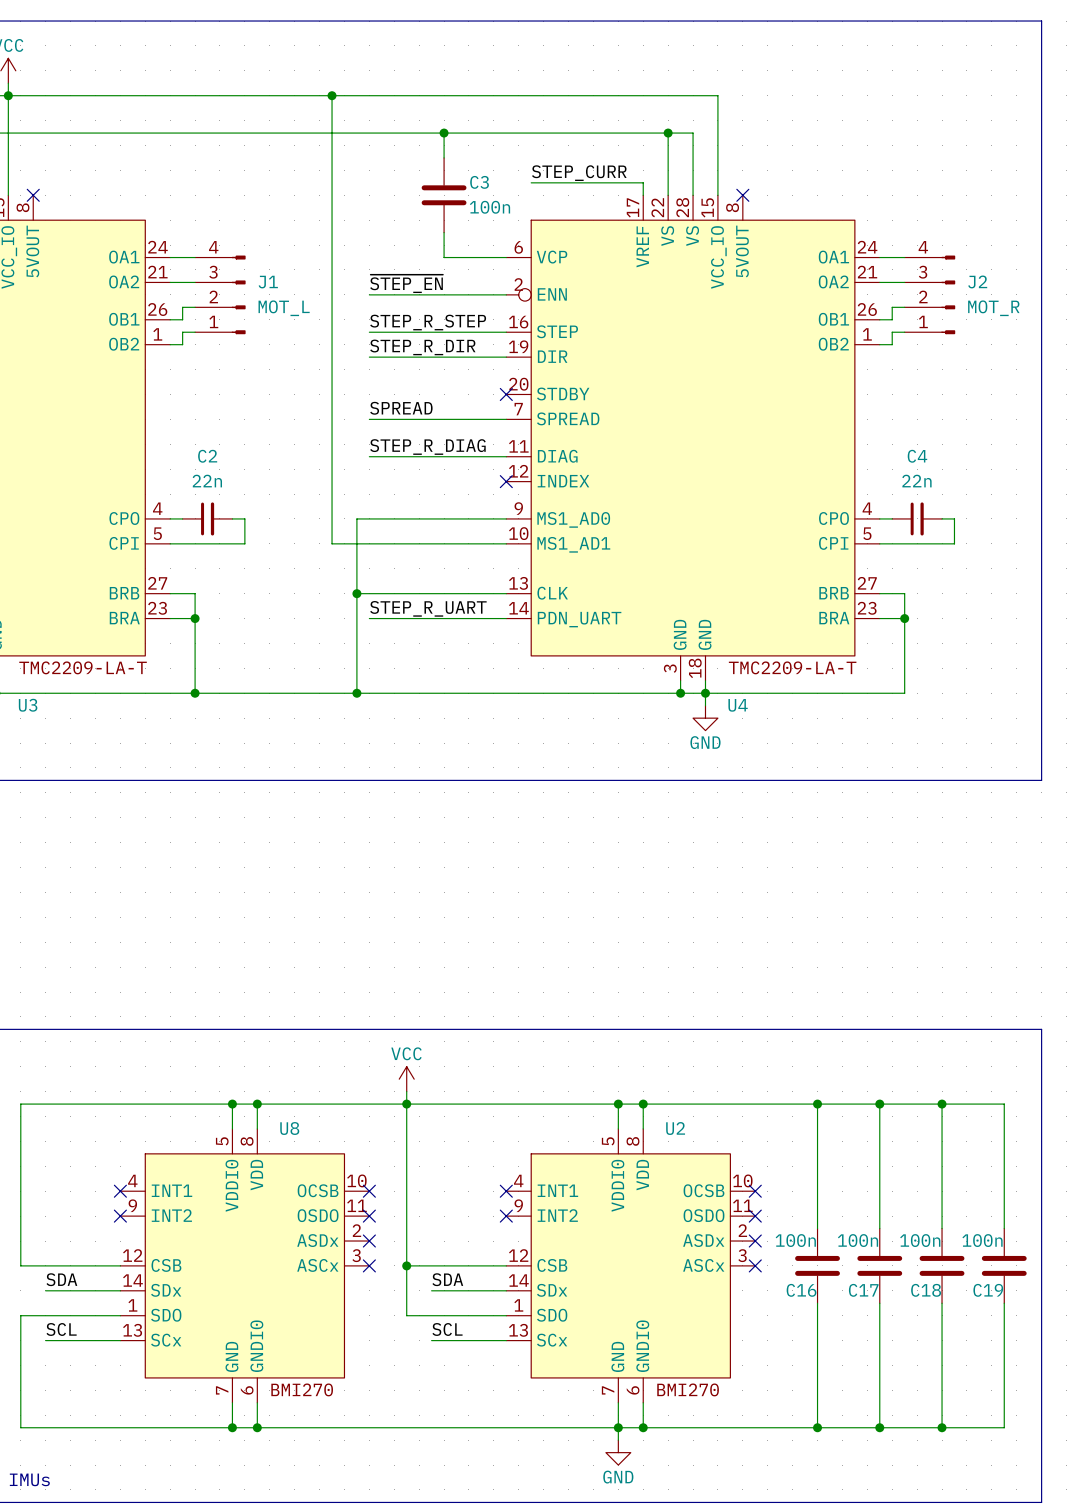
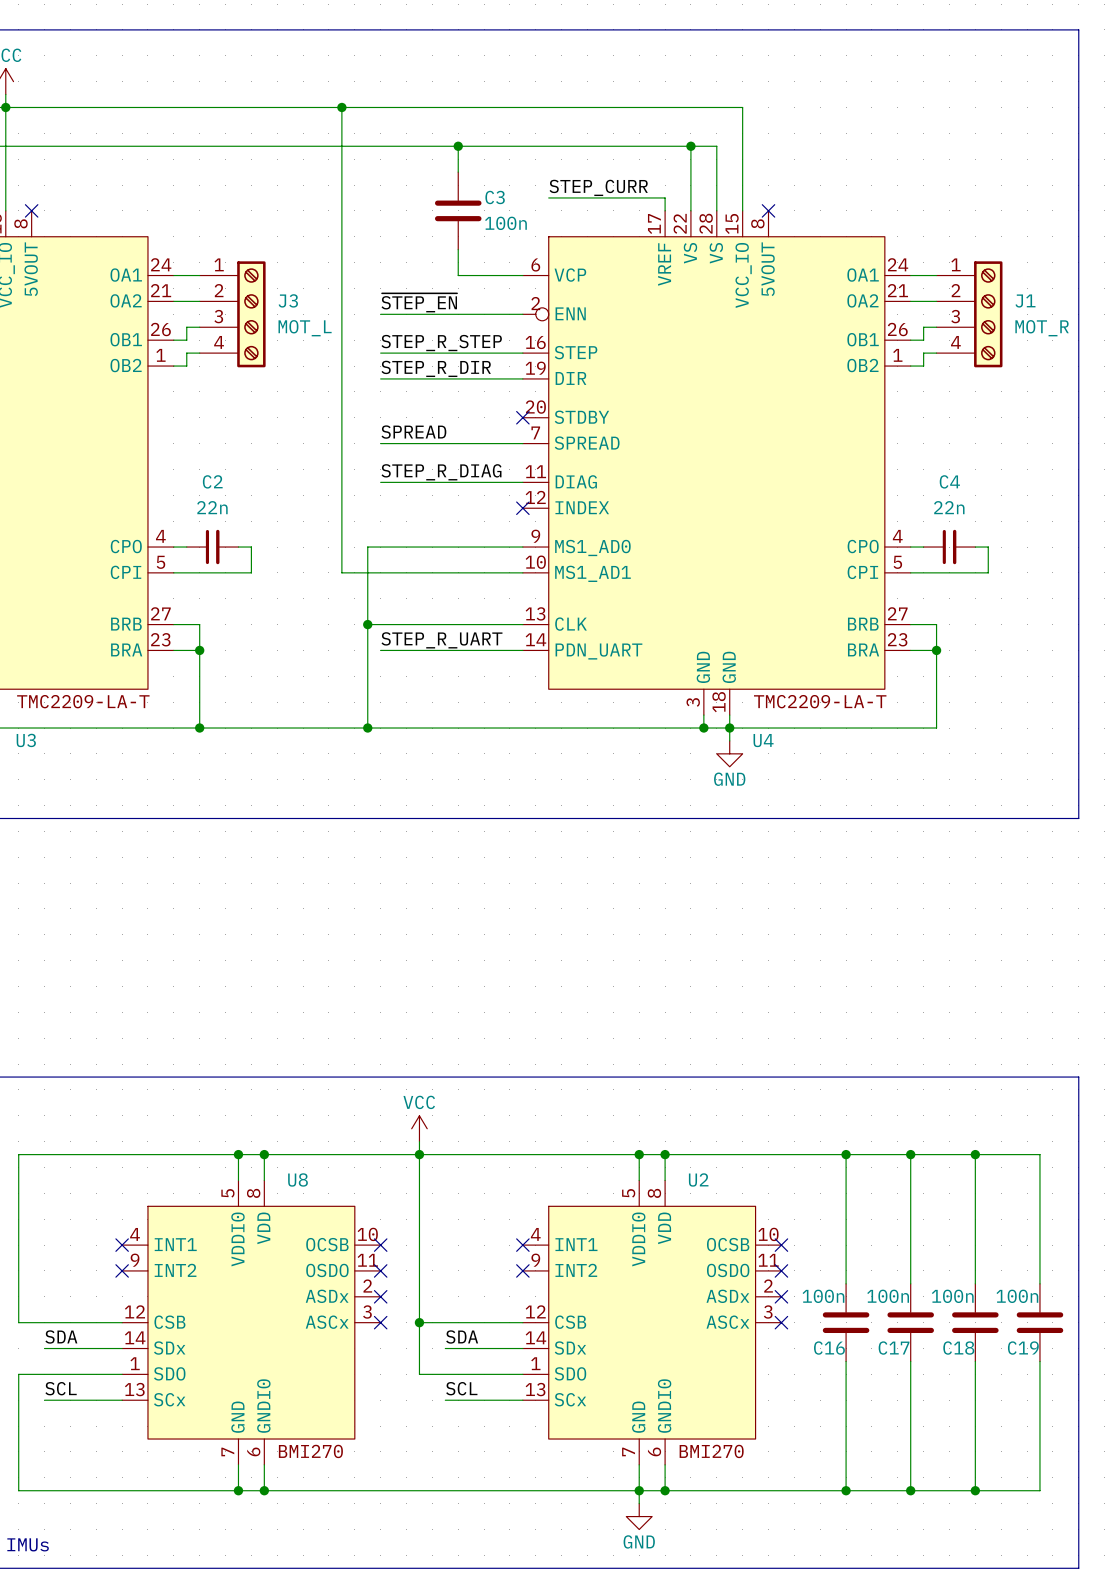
J1 symbol: [195, 255, 246, 335] -> [936, 261, 1003, 368]
J3: none -> MOT_L (232, 314)
J2: MOT_R (929, 294) -> none
J1 value: MOT_L (284, 308) -> MOT_R (1042, 328)

